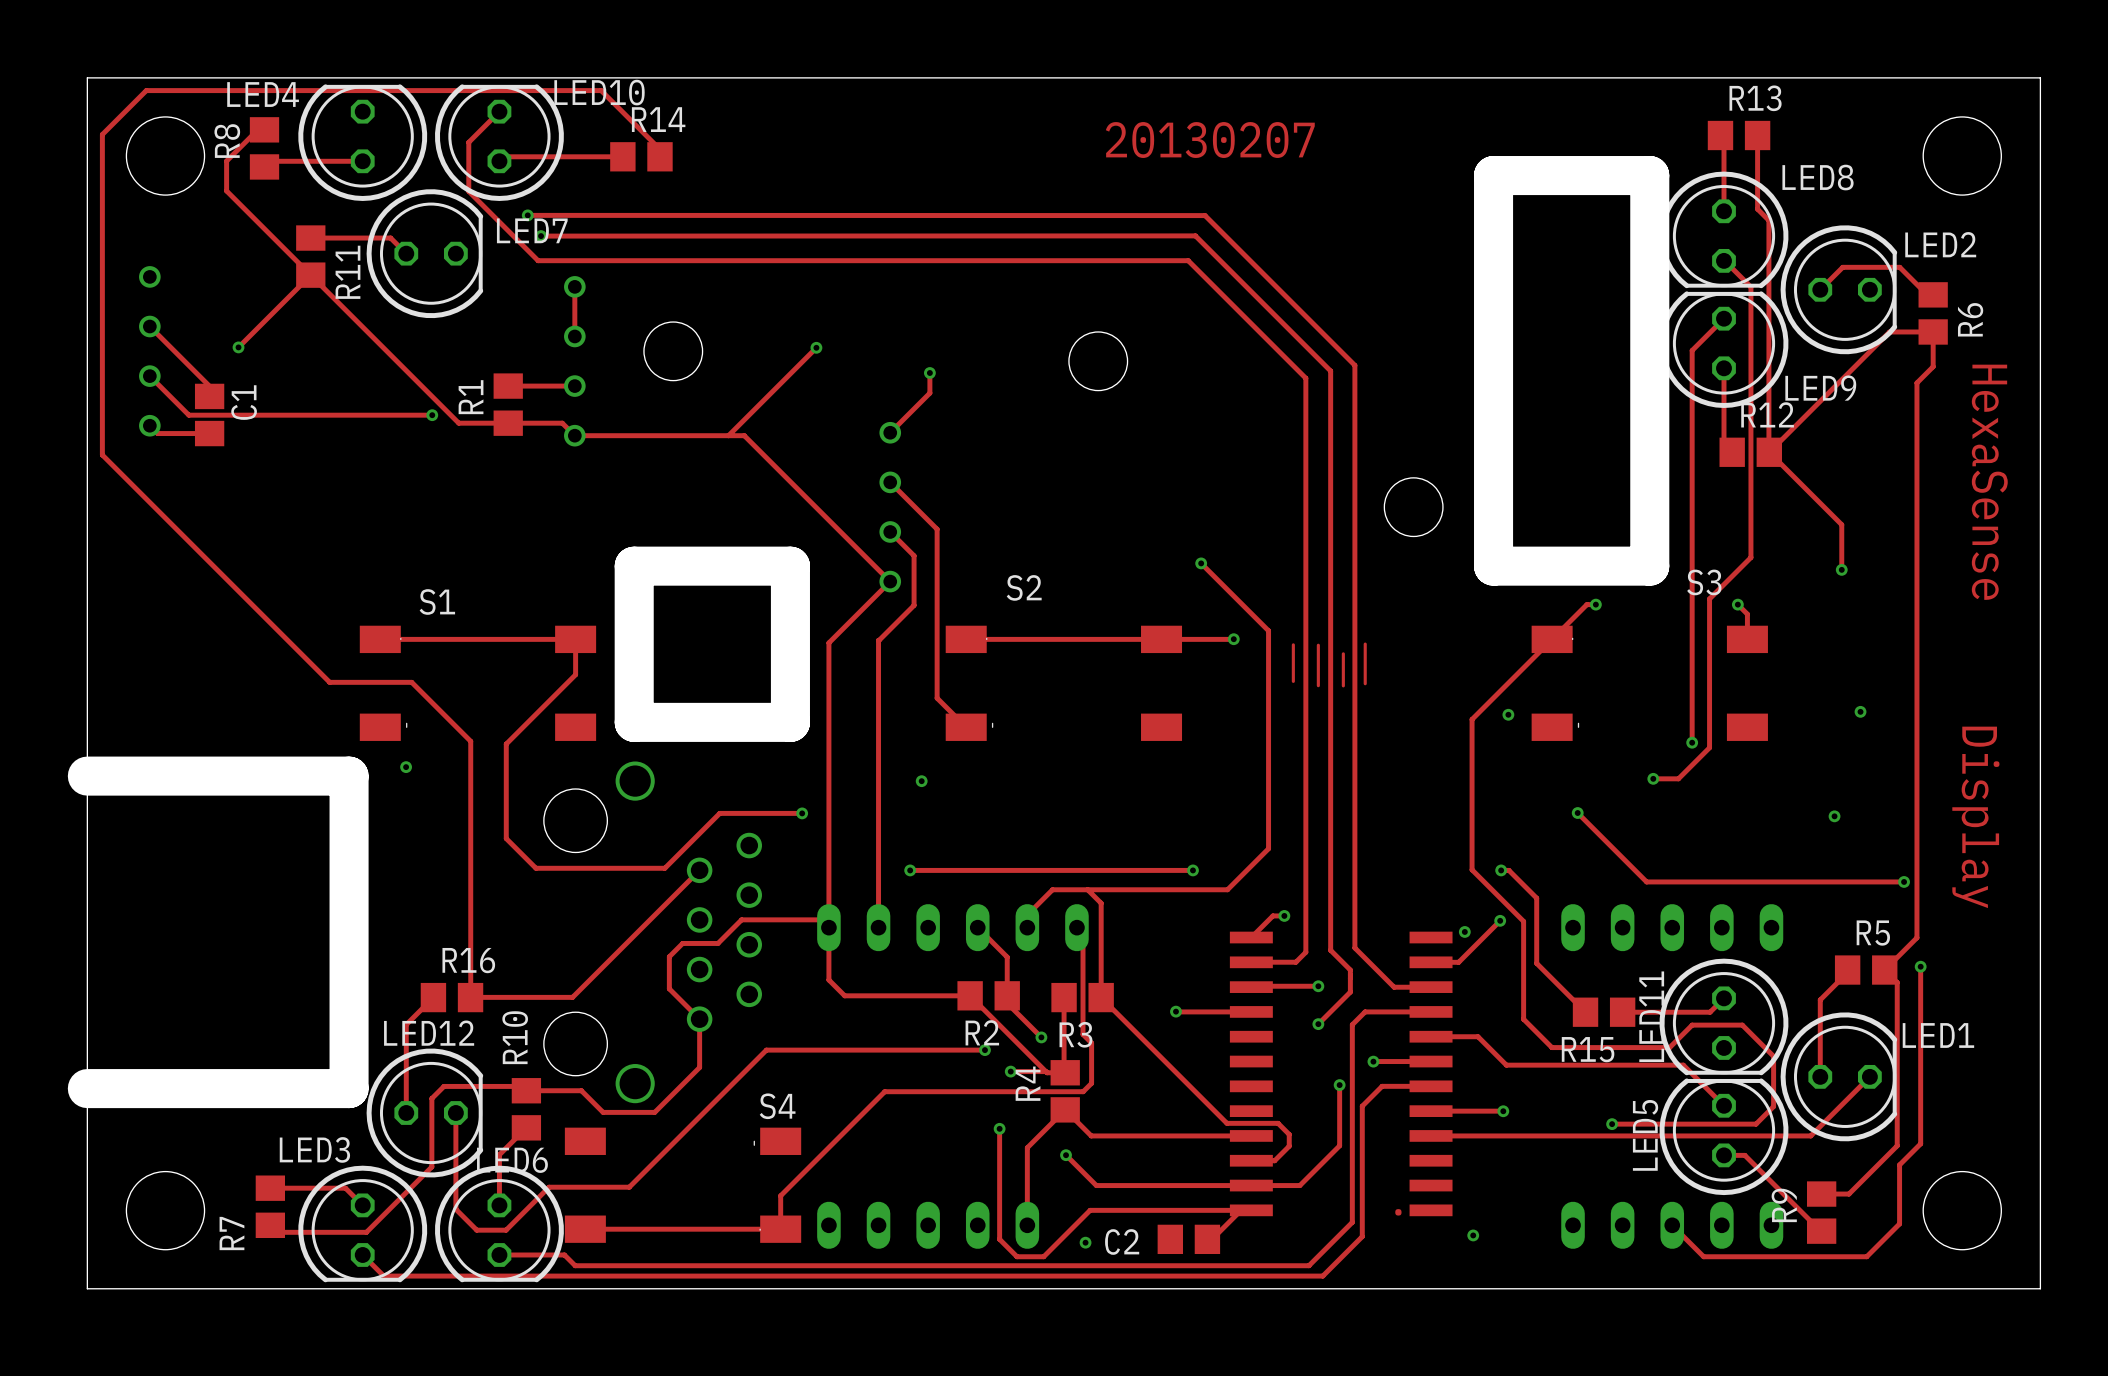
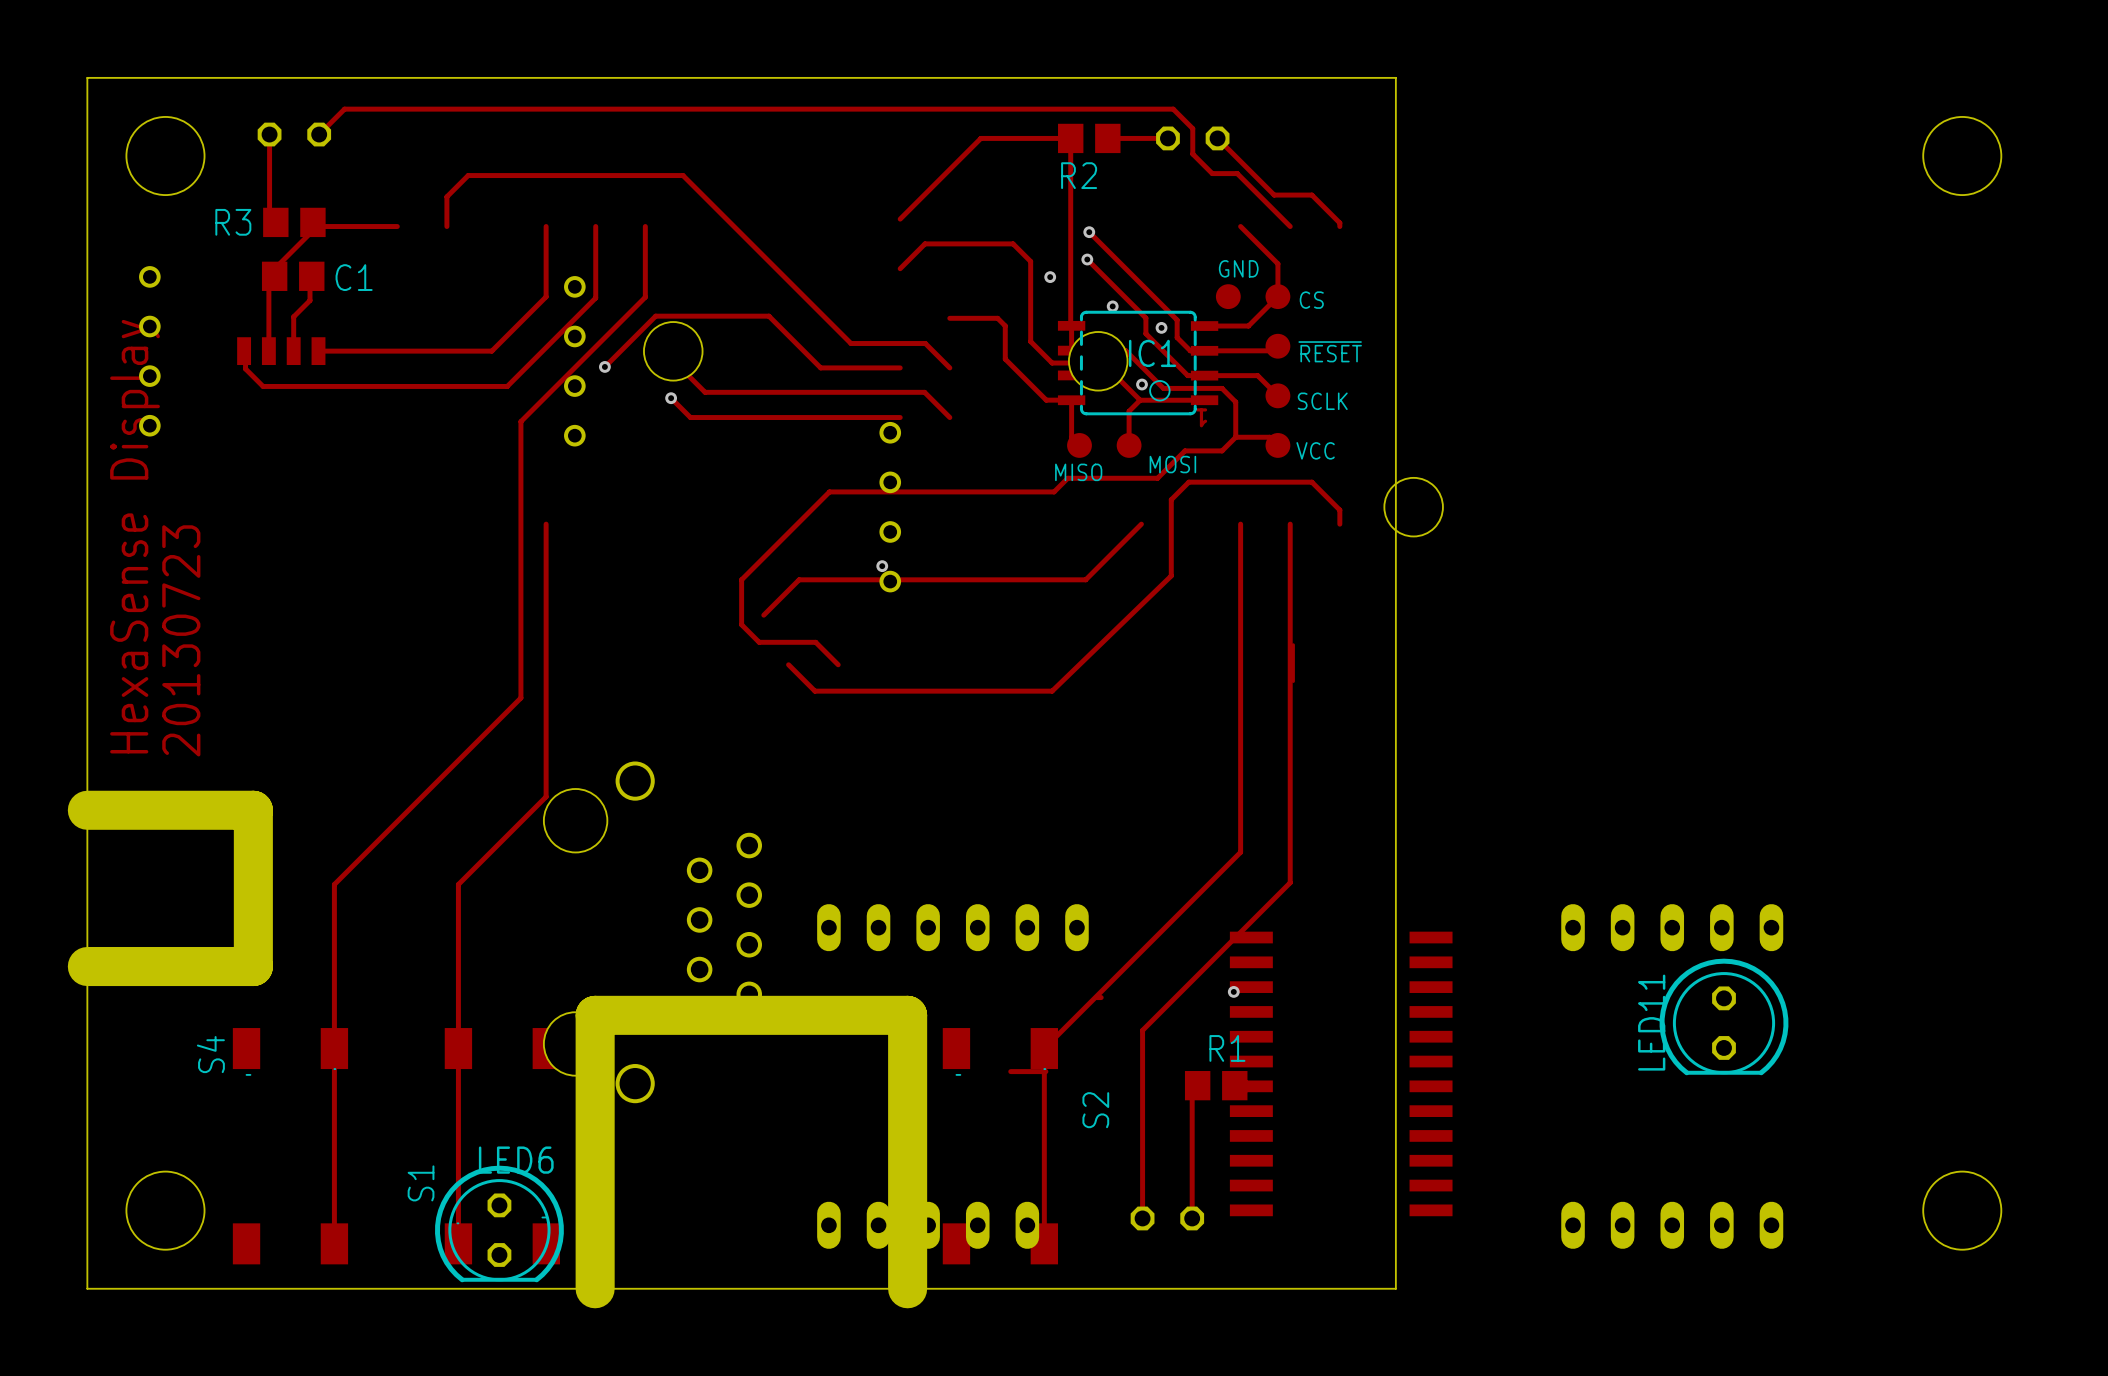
board edge: (1395, 77) (2040, 77) (2040, 1288) (1395, 1288) -> (1395, 77) (1395, 1288)
track: (499, 111) (468, 142) (468, 191) (538, 260) (1188, 260) (1305, 378) (1305, 952) (1295, 962) (1251, 962) -> none
track: (264, 129) (257, 129) (226, 161) (226, 190) (458, 423) (562, 423) (574, 435) (744, 435) (890, 581) (828, 642) (828, 979) (844, 995) (970, 995) (1047, 1072) (1065, 1072) (1064, 997) -> none
track: none -> (269, 134) (269, 216) (275, 222)
part: none -> (294, 134)
track: none -> (319, 134) (344, 109) (1173, 109) (1192, 128) (1192, 154) (1212, 173) (1237, 173) (1290, 226)
track: (1720, 135) (1724, 139) (1724, 211) -> none
R13: (1739, 135) -> none
track: (1757, 135) (1757, 209) (1768, 220) (1768, 451) (1841, 524) (1841, 569) -> none
track: none -> (1107, 138) (1167, 138)
part: none -> (1192, 138)
track: none -> (1217, 138) (1274, 195) (1311, 195) (1339, 223) (1339, 226)
text: 20130207 (1210, 140) -> none
LED4: (362, 142) -> none
LED10: (499, 142) -> none
R8: (264, 148) -> none
track: (622, 156) (503, 156) (499, 161) -> none
R14: (641, 156) -> none
track: (659, 156) (659, 149) (601, 90) (146, 90) (102, 134) (102, 455) (329, 682) (411, 682) (470, 741) (470, 997) (572, 997) (699, 870) -> none
track: (362, 161) (270, 161) (264, 166) -> none
board edge: (1493, 175) (1649, 175) (1649, 566) (1493, 566) (1493, 175) -> none
track: (527, 215) (1205, 215) (1354, 365) (1354, 947) (1394, 987) (1430, 987) -> none
via: (527, 215) -> none
track: none -> (900, 219) (980, 138) (1070, 138) (1071, 350) (1125, 350) (1163, 388) (1222, 388) (1235, 402) (1235, 437)
track: none -> (317, 226) (397, 226)
track: none -> (317, 226) (274, 268) (274, 276) (268, 276) (268, 351)
track: none -> (446, 226) (446, 196) (468, 175) (683, 175) (850, 343) (925, 343) (949, 367)
track: none -> (546, 226) (546, 296) (491, 351) (318, 351)
track: none -> (595, 226) (595, 297) (507, 386) (263, 386) (245, 368) (244, 351)
track: none -> (645, 226) (645, 297) (520, 421) (520, 697) (334, 884) (334, 1243)
track: none -> (1240, 226) (1277, 263) (1277, 296) (1248, 326) (1204, 326)
LED9: (1724, 229) -> none
track: none -> (1089, 232) (1177, 320) (1177, 337) (1190, 350) (1273, 350) (1277, 346)
via: none -> (1089, 232)
track: (541, 236) (1195, 235) (1330, 371) (1330, 950) (1350, 970) (1350, 992) (1318, 1024) -> none
via: (541, 236) -> none
track: (310, 238) (390, 238) (406, 253) -> none
LED7: (424, 253) -> none
R11: (310, 256) -> none
track: none -> (1087, 259) (1145, 318) (1145, 333) (1187, 375) (1257, 375) (1277, 395)
via: none -> (1087, 259)
track: (1724, 260) (1750, 287) (1750, 557) (1709, 598) (1709, 747) (1678, 778) (1653, 778) -> none
track: none -> (900, 268) (925, 243) (1013, 243) (1030, 261) (1030, 341) (1052, 363) (1102, 363) (1140, 400)
track: (310, 275) (238, 347) -> none
track: none -> (311, 276) (310, 278) (310, 300) (293, 316) (293, 351)
via: none -> (1050, 277)
track: (574, 286) (574, 336) -> none
track: (1820, 289) (1842, 267) (1899, 267) (1927, 294) (1933, 294) -> none
LED2: (1838, 289) -> none
GND: none -> (1228, 296)
CS: none -> (1277, 296)
via: none -> (1112, 306)
R6: (1933, 313) -> none
track: none -> (949, 318) (997, 318) (1005, 325) (1005, 359) (1046, 400) (1071, 400)
track: (1724, 318) (1692, 350) (1692, 742) -> none
track: (149, 326) (209, 386) (209, 396) -> none
via: none -> (1161, 327)
~{RESET}: none -> (1277, 346)
via: (238, 347) -> none
track: (816, 347) (728, 435) -> none
via: (816, 347) -> none
track: none -> (661, 348) (705, 392) (924, 392) (949, 417)
LED8: (1724, 349) -> none
part: none -> (281, 351)
IC1: none -> (1138, 363)
track: none -> (604, 366) (655, 316) (768, 316) (820, 367) (900, 367)
via: none -> (604, 366)
track: (1724, 368) (1724, 444) (1732, 452) -> none
track: (929, 372) (929, 393) (890, 432) -> none
via: (929, 372) -> none
track: (149, 376) (188, 415) (432, 415) -> none
via: none -> (1141, 384)
track: (508, 386) (574, 386) -> none
SCLK: none -> (1277, 395)
track: none -> (671, 398) (690, 417) (900, 417)
via: none -> (671, 398)
track: none -> (1071, 400) (1071, 437) (1079, 445)
track: none -> (1140, 400) (1204, 400)
track: none -> (1140, 400) (1129, 411) (1129, 445)
R1 rotation: 0° (508, 404) -> 90° clockwise (1216, 1085)
R1 position: (508, 404) -> (1216, 1085)
C1 rotation: 0° (209, 414) -> 90° clockwise (293, 276)
C1 position: (209, 414) -> (293, 276)
via: (432, 415) -> none
text: none -> 1 (1201, 417)
track: (149, 425) (157, 433) (209, 433) -> none
track: none -> (1235, 437) (1222, 450) (1184, 450) (1157, 478) (1067, 478) (1054, 491) (829, 491) (741, 579) (741, 624) (759, 642) (815, 642) (838, 664)
track: none -> (1235, 437) (1269, 437) (1277, 445)
MISO: none -> (1079, 445)
MOSI: none -> (1129, 445)
VCC: none -> (1277, 445)
R12: (1750, 452) -> none
track: (1769, 452) (1889, 331) (1933, 331) (1933, 366) (1916, 382) (1916, 937) (1884, 970) (1897, 982) (1897, 1145) (1848, 1194) (1821, 1194) -> none
track: (890, 482) (937, 529) (937, 698) (966, 727) -> none
text: HexaSense (1989, 482) -> none
track: none -> (546, 524) (546, 796) (458, 884) (458, 1243)
track: none -> (1141, 524) (1085, 579) (799, 579) (763, 615)
track: none -> (1240, 524) (1240, 852) (1044, 1048) (1044, 1243)
track: none -> (1290, 524) (1290, 882) (1142, 1030) (1142, 1218)
track: none -> (1339, 524) (1339, 510) (1311, 482) (1188, 482) (1171, 499) (1171, 575) (1052, 691) (814, 691) (788, 664)
track: (890, 531) (914, 555) (914, 605) (878, 640) (878, 927) -> none
text: none -> HexaSense Display (135, 536)
track: (1201, 563) (1268, 630) (1268, 848) (1227, 889) (1052, 889) (1027, 914) (1027, 927) -> none
via: (1201, 563) -> none
board edge: (634, 566) (790, 566) (790, 722) (634, 722) (634, 566) -> none
via: none -> (882, 566)
via: (1841, 569) -> none
track: (1595, 604) (1586, 604) (1472, 719) (1472, 869) (1523, 921) (1523, 1019) (1551, 1047) (1669, 1047) (1692, 1025) (1742, 1025) (1773, 1056) (1773, 1106) (1756, 1124) (1612, 1124) -> none
via: (1595, 604) -> none
track: (1737, 604) (1747, 614) (1747, 639) -> none
via: (1737, 604) -> none
track: (380, 639) (575, 639) (575, 674) (506, 744) (506, 838) (535, 868) (664, 868) (719, 813) (802, 813) -> none
track: (966, 639) (1233, 639) -> none
via: (1233, 639) -> none
track: (1365, 644) (1365, 683) -> none
track: (1318, 645) (1318, 685) -> none
track: (1343, 653) (1343, 685) -> none
text: none -> 20130723 (181, 640)
S1 rotation: 0° (477, 683) -> 90° counterclockwise (502, 1146)
S1 position: (477, 683) -> (502, 1146)
S2 rotation: 0° (1063, 683) -> 90° clockwise (1000, 1146)
S2 position: (1063, 683) -> (1000, 1146)
S3: (1649, 683) -> none
via: (1860, 711) -> none
via: (1508, 714) -> none
via: (1692, 742) -> none
via: (406, 767) -> none
board edge: (87, 776) (349, 776) (349, 1088) (87, 1088) -> none
via: (1653, 778) -> none
via: (921, 781) -> none
board edge: none -> (87, 810) (253, 810) (253, 966) (87, 966)
via: (802, 813) -> none
track: (1577, 813) (1646, 881) (1904, 881) -> none
via: (1577, 813) -> none
via: (1834, 816) -> none
text: Display (1975, 817) -> none
track: (910, 870) (1192, 870) -> none
via: (910, 870) -> none
via: (1192, 870) -> none
track: (1501, 870) (1508, 870) (1536, 898) (1536, 963) (1585, 1012) -> none
via: (1501, 870) -> none
via: (1904, 881) -> none
track: (1087, 889) (1101, 903) (1101, 997) (1226, 1123) (1278, 1123) (1289, 1134) (1289, 1146) (1274, 1160) (1251, 1160) -> none
track: (1284, 915) (1272, 915) (1251, 937) -> none
via: (1284, 915) -> none
track: (1500, 920) (1458, 962) (1431, 962) -> none
via: (1500, 920) -> none
track: (828, 927) (821, 919) (741, 919) (717, 943) (682, 943) (669, 956) (669, 988) (699, 1019) (699, 1067) (654, 1112) (603, 1112) (581, 1090) (526, 1090) (522, 1086) (443, 1086) (431, 1098) (431, 1166) (366, 1232) (277, 1232) (270, 1225) -> none
track: (977, 927) (1007, 957) (1007, 1003) (1041, 1037) -> none
track: (1076, 927) (1083, 933) (1083, 1034) (1091, 1043) (1091, 1083) (1083, 1091) (884, 1091) (780, 1195) (780, 1229) (585, 1229) -> none
via: (1464, 931) -> none
track: (1920, 966) (1920, 1143) (1899, 1164) (1899, 1223) (1866, 1256) (1703, 1256) (1672, 1225) -> none
via: (1920, 966) -> none
track: (1847, 970) (1855, 964) (1820, 999) (1820, 1076) -> none
R5: (1866, 970) -> none
track: (1318, 986) (1251, 987) -> none
via: (1318, 986) -> none
via: none -> (1233, 991)
R2 position: (988, 995) -> (1089, 138)
track: (433, 997) (406, 1024) (406, 1113) -> none
R16: (451, 997) -> none
R3 position: (1082, 997) -> (294, 222)
track: (1724, 998) (1710, 1012) (1622, 1012) -> none
track: (1175, 1011) (1251, 1011) -> none
via: (1175, 1011) -> none
track: (1431, 1011) (1365, 1011) (1352, 1024) (1352, 1222) (1308, 1265) (575, 1265) (564, 1254) (499, 1254) -> none
R15: (1604, 1012) -> none
via: (1318, 1024) -> none
R3 name position: R3 (1075, 1034) -> R3 (233, 222)
track: (1431, 1036) (1478, 1036) (1506, 1065) (1683, 1065) (1724, 1105) -> none
via: (1041, 1037) -> none
track: (984, 1050) (766, 1050) (629, 1187) (549, 1187) (506, 1230) (476, 1230) (455, 1209) (455, 1113) -> none
via: (984, 1050) -> none
track: (1373, 1061) (1431, 1061) -> none
via: (1373, 1061) -> none
via: (1010, 1071) -> none
LED1: (1838, 1076) -> none
track: (1869, 1076) (1810, 1135) (1431, 1135) -> none
track: none -> (1197, 1085) (1193, 1087) (1192, 1091) (1192, 1218)
track: (1339, 1085) (1339, 1145) (1299, 1185) (1096, 1185) (1066, 1155) -> none
via: (1339, 1085) -> none
track: (1431, 1086) (1382, 1086) (1362, 1106) (1362, 1236) (1322, 1276) (383, 1276) (362, 1254) -> none
R4: (1065, 1091) -> none
R10: (526, 1109) -> none
track: (1431, 1111) (1503, 1111) -> none
via: (1503, 1111) -> none
LED12: (424, 1113) -> none
via: (1612, 1124) -> none
track: (526, 1127) (499, 1154) (499, 1205) -> none
track: (999, 1128) (999, 1239) (1017, 1256) (1043, 1256) (1090, 1210) (1251, 1210) -> none
via: (999, 1128) -> none
track: (1251, 1135) (1091, 1135) (1065, 1109) (1027, 1147) (1027, 1225) -> none
LED5: (1724, 1136) -> none
via: (1066, 1155) -> none
track: (1724, 1155) (1744, 1155) (1821, 1231) -> none
S4 rotation: 0° (683, 1185) -> 90° counterclockwise (290, 1146)
S4 position: (683, 1185) -> (290, 1146)
track: (270, 1188) (345, 1188) (362, 1205) -> none
R7: (270, 1206) -> none
track: (1241, 1210) (1212, 1239) (1207, 1239) -> none
text: . (1398, 1212) -> none
R9: (1821, 1212) -> none
part: none -> (1167, 1218)
LED3: (362, 1223) -> none
via: (1473, 1235) -> none
C2: (1188, 1239) -> none
via: (1085, 1242) -> none
board edge: none -> (595, 1288) (595, 1015) (907, 1015) (907, 1288)

